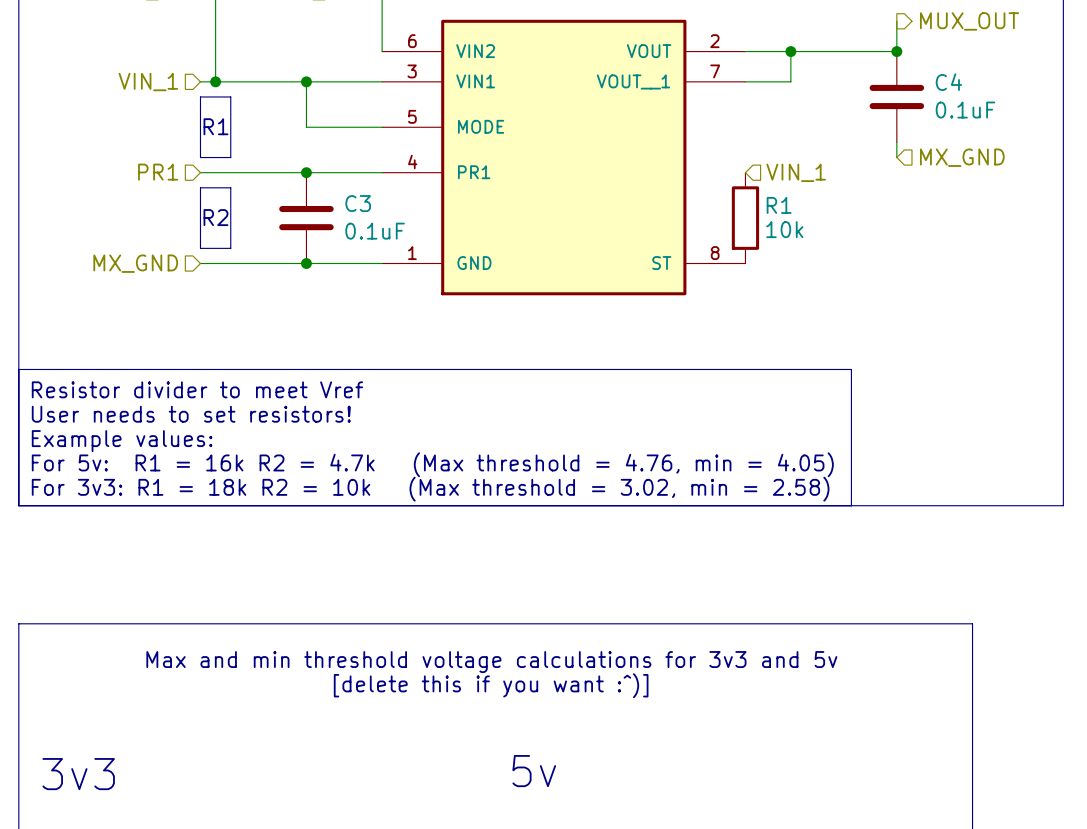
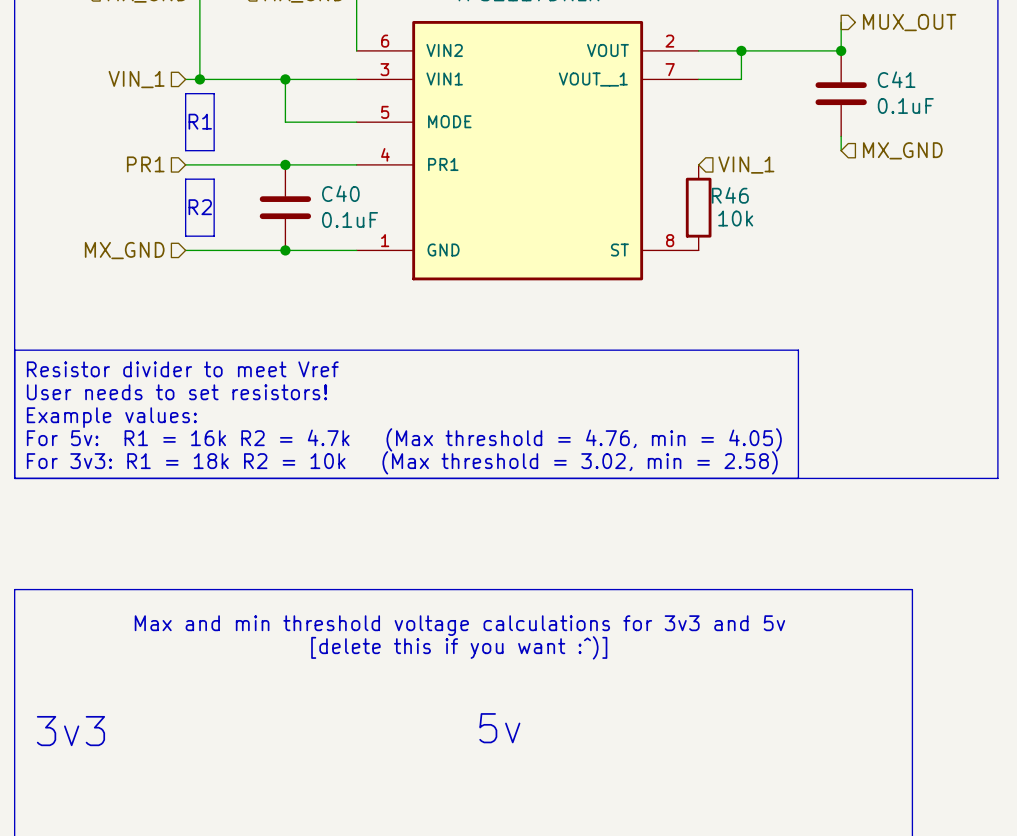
C4 name: C4 (948, 82) -> C41 (896, 79)
C3 name: C3 (358, 203) -> C40 (340, 193)
R1 name: R1 (779, 205) -> R46 (730, 195)

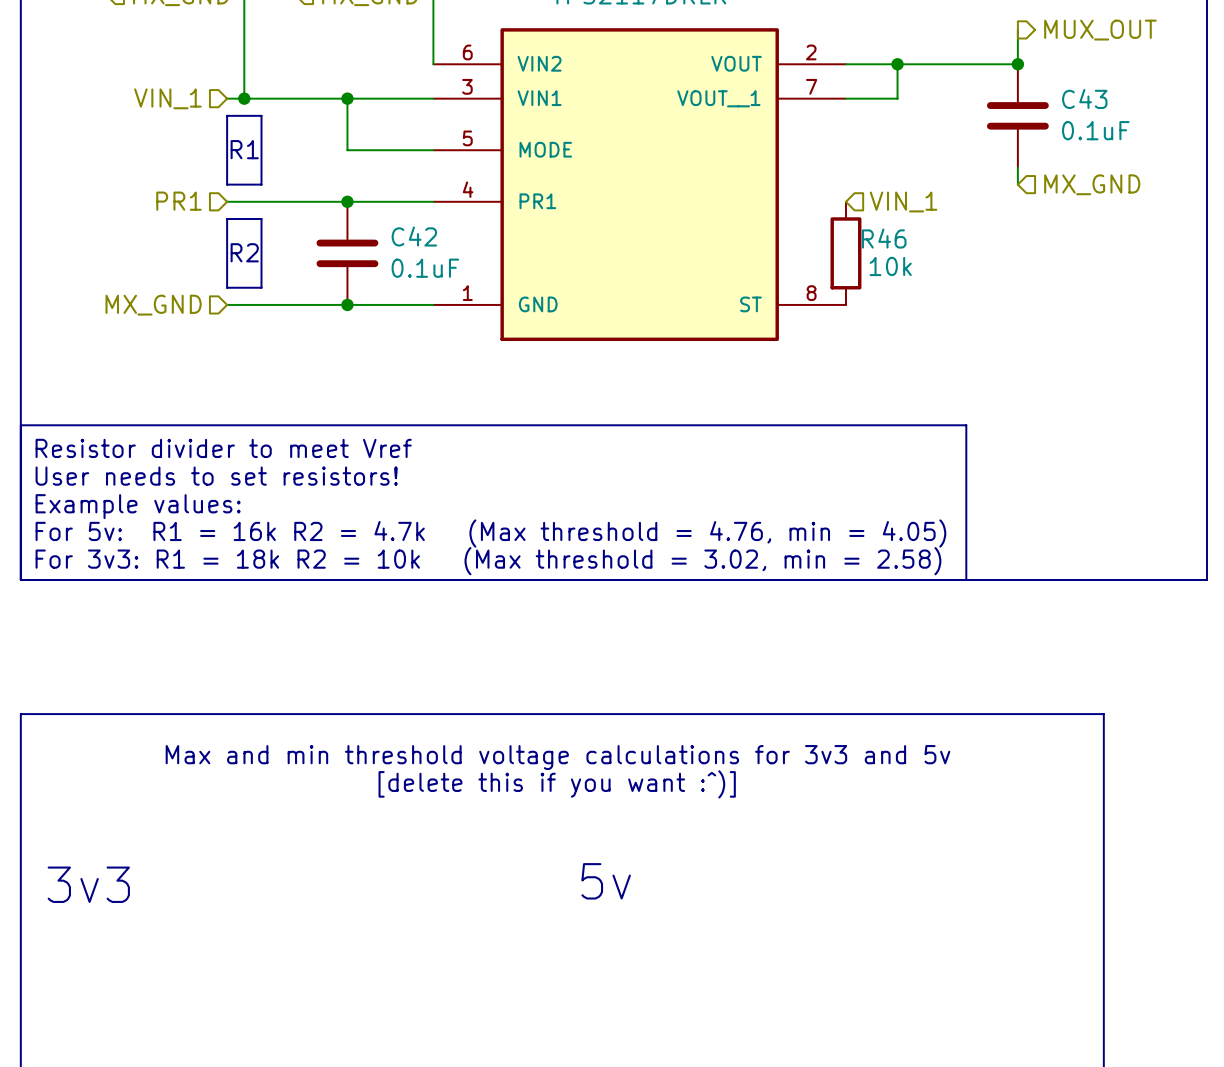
C41 name: C41 (896, 79) -> C43 (1084, 98)
C40 name: C40 (340, 193) -> C42 (414, 236)

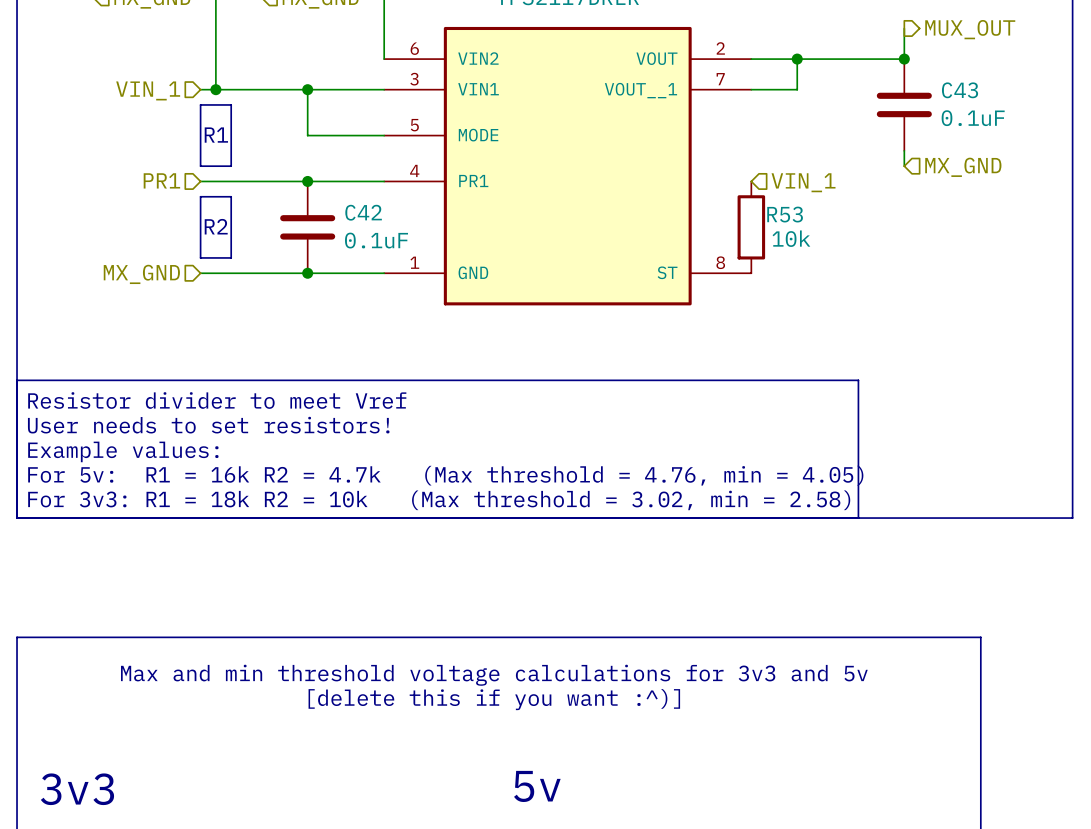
R46 name: R46 (884, 238) -> R53 (785, 214)

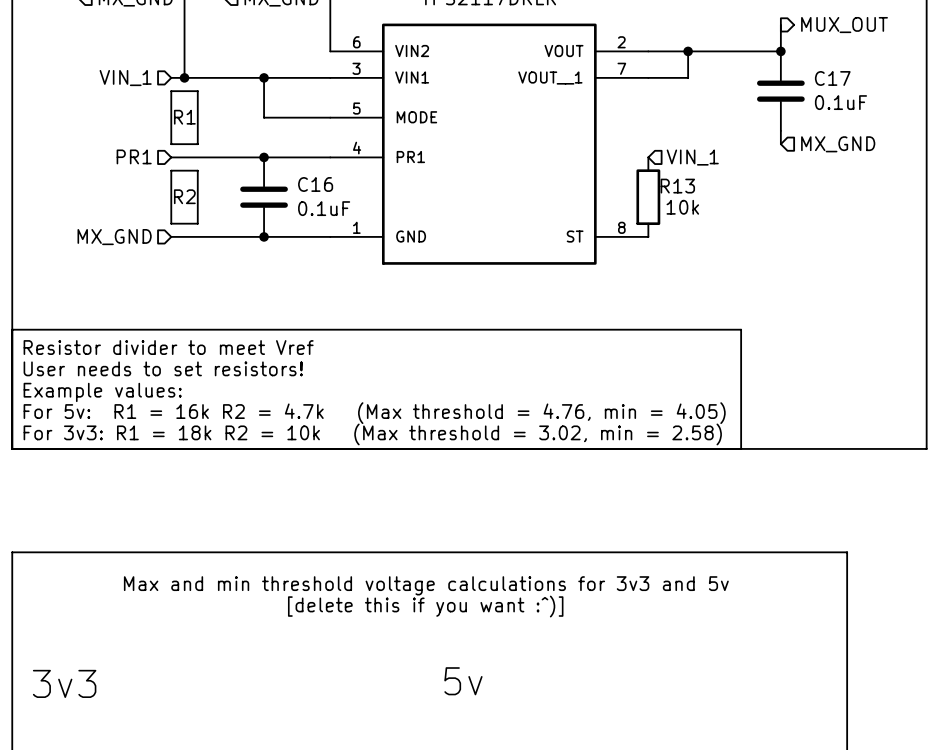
C43 name: C43 (960, 90) -> C17 (832, 78)
C42 name: C42 (363, 212) -> C16 (315, 184)
R53 name: R53 (785, 214) -> R13 (677, 186)

